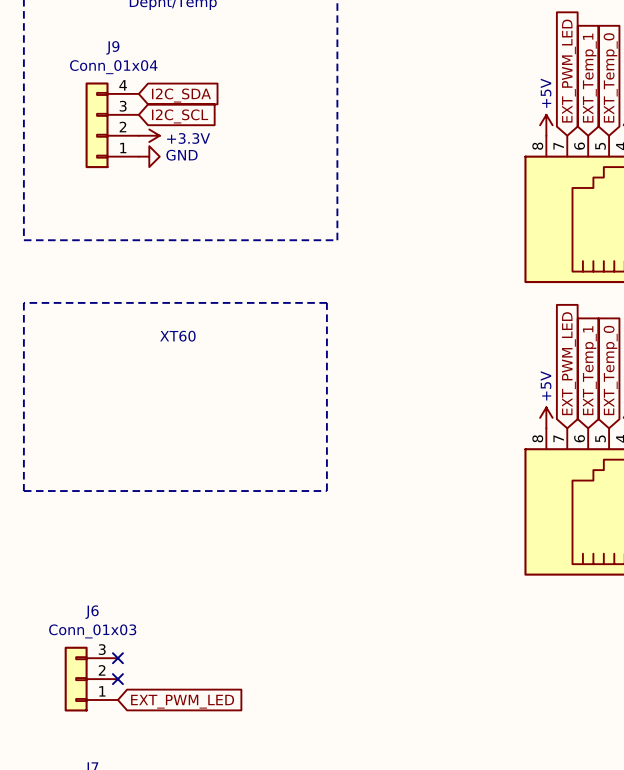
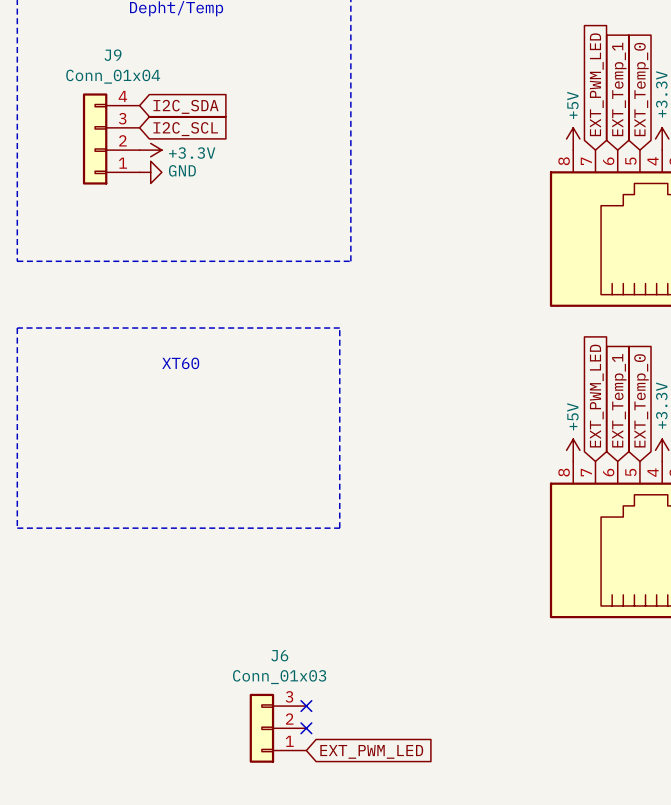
no-connect mark: (117, 658) -> none
no-connect mark: none -> (306, 706)
J6 position: (91, 679) -> (278, 728)
no-connect mark: (117, 679) -> none
no-connect mark: none -> (306, 728)
global label position: EXT_PWM_LED (182, 701) -> EXT_PWM_LED (371, 751)

